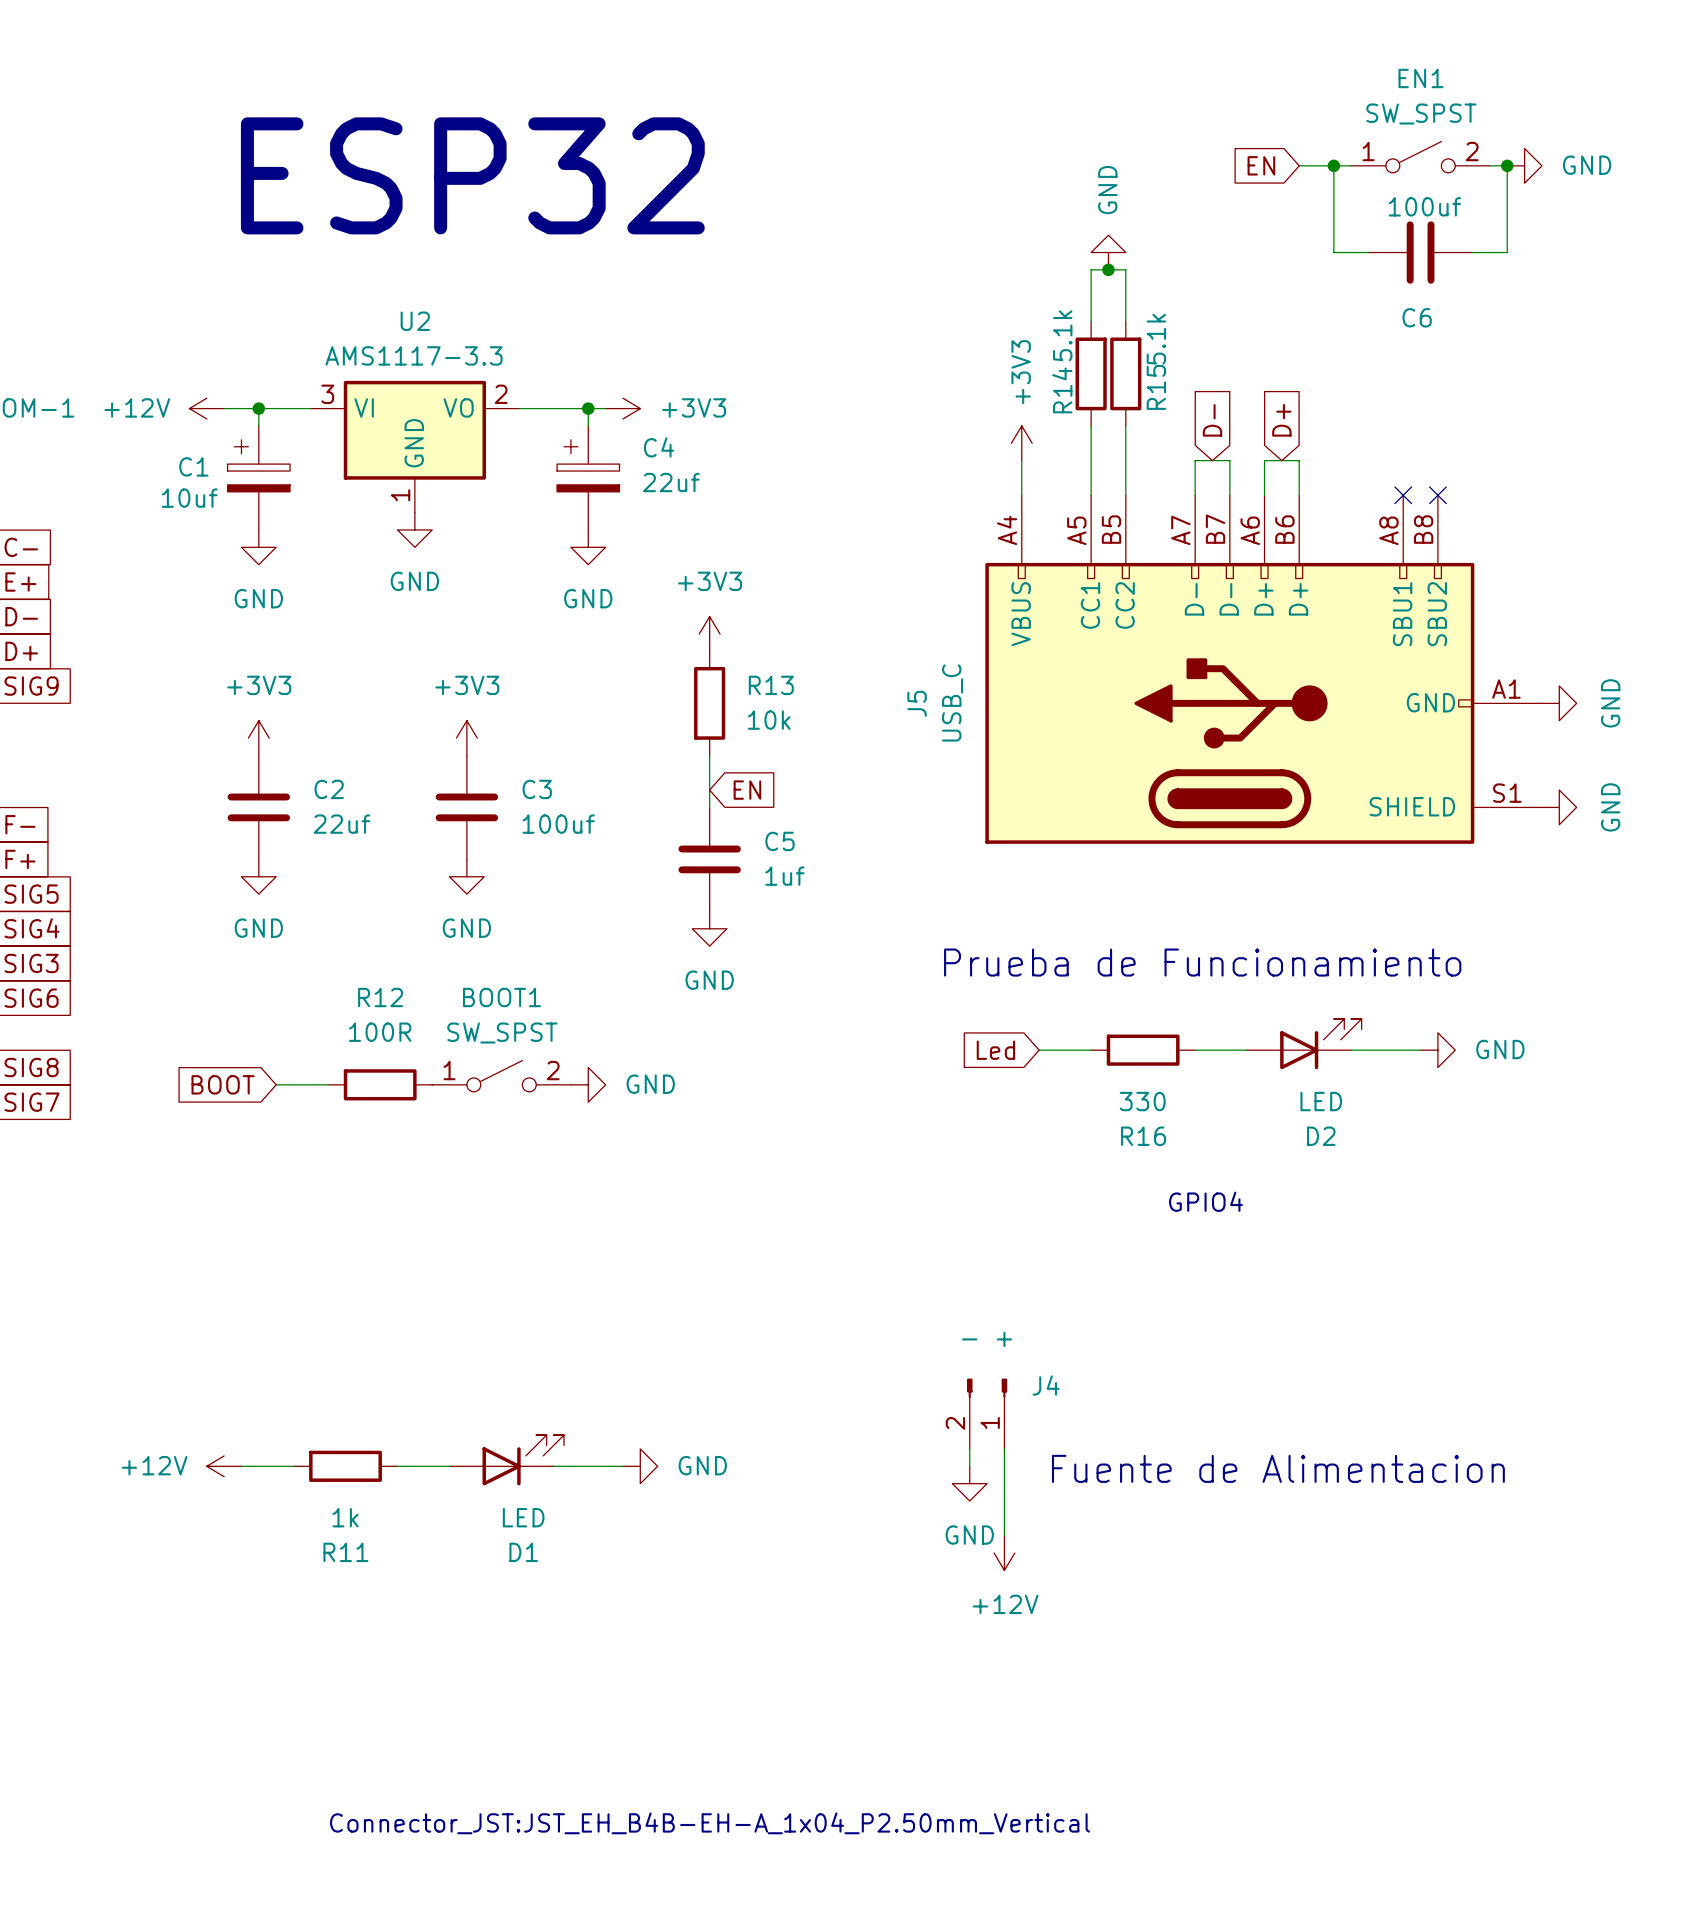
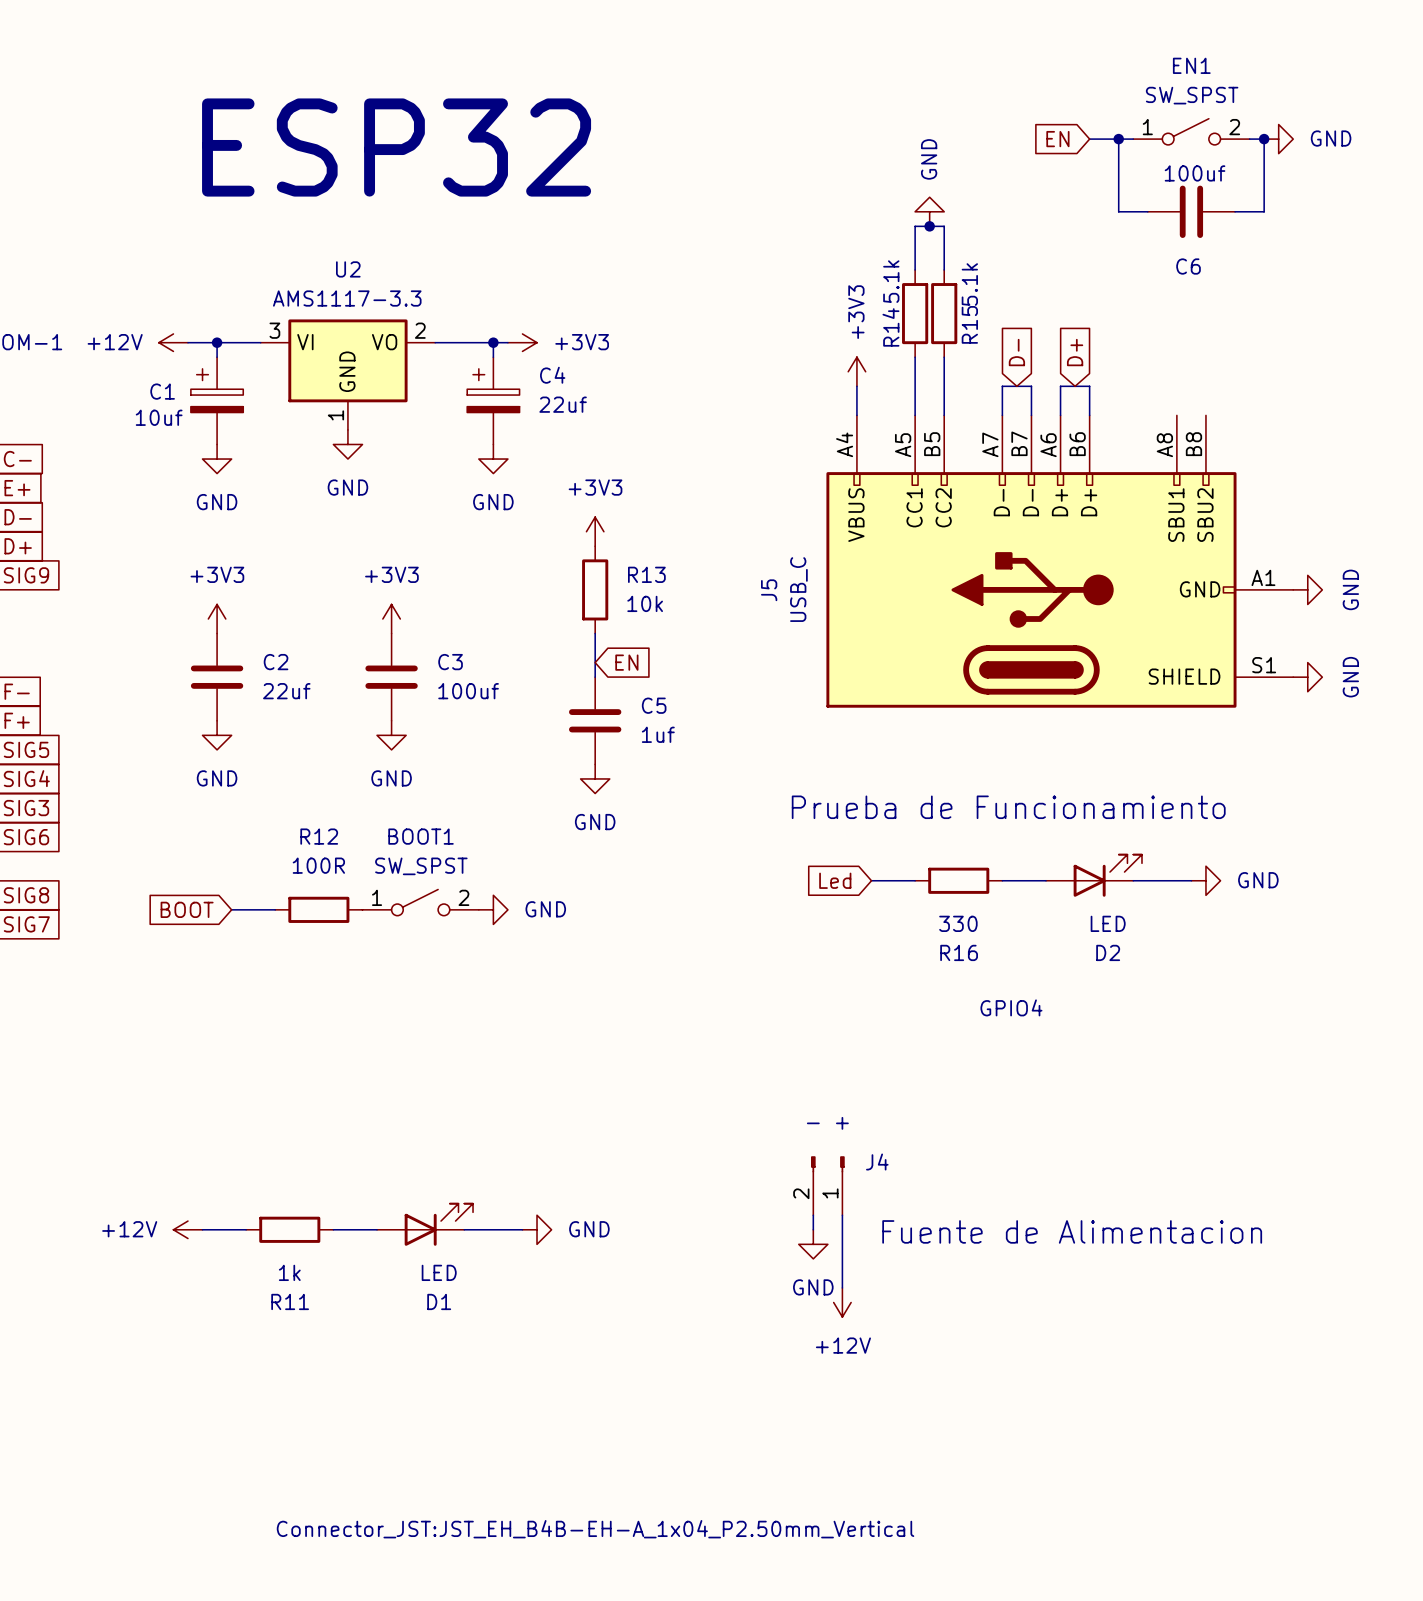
no-connect mark: (1403, 495) -> none
no-connect mark: (1437, 495) -> none

